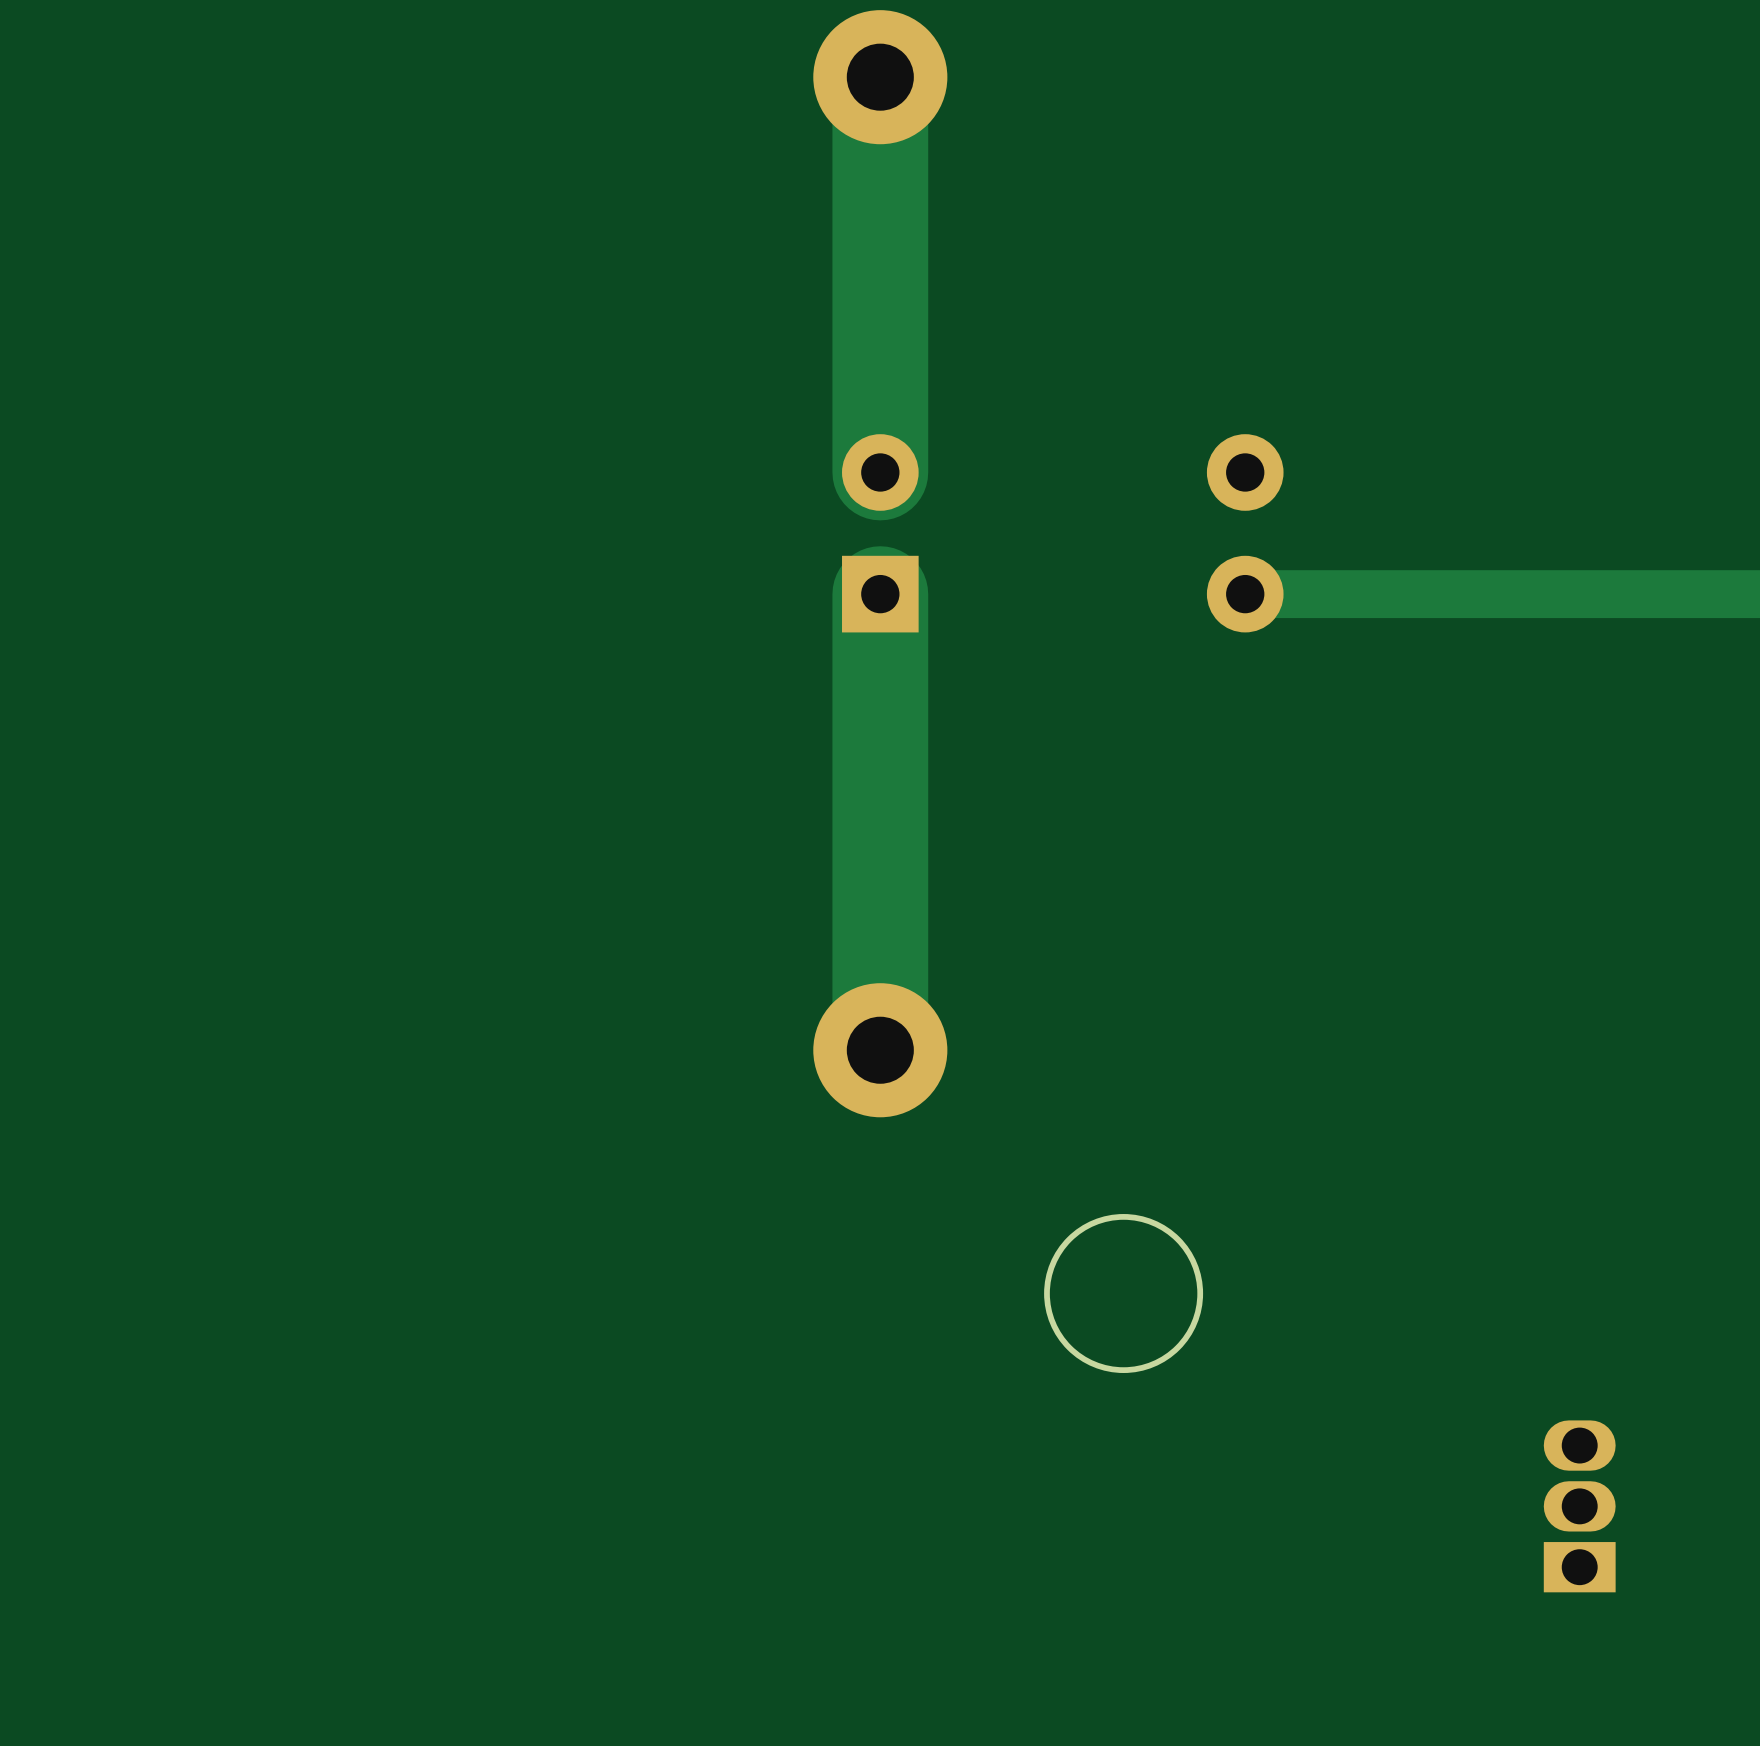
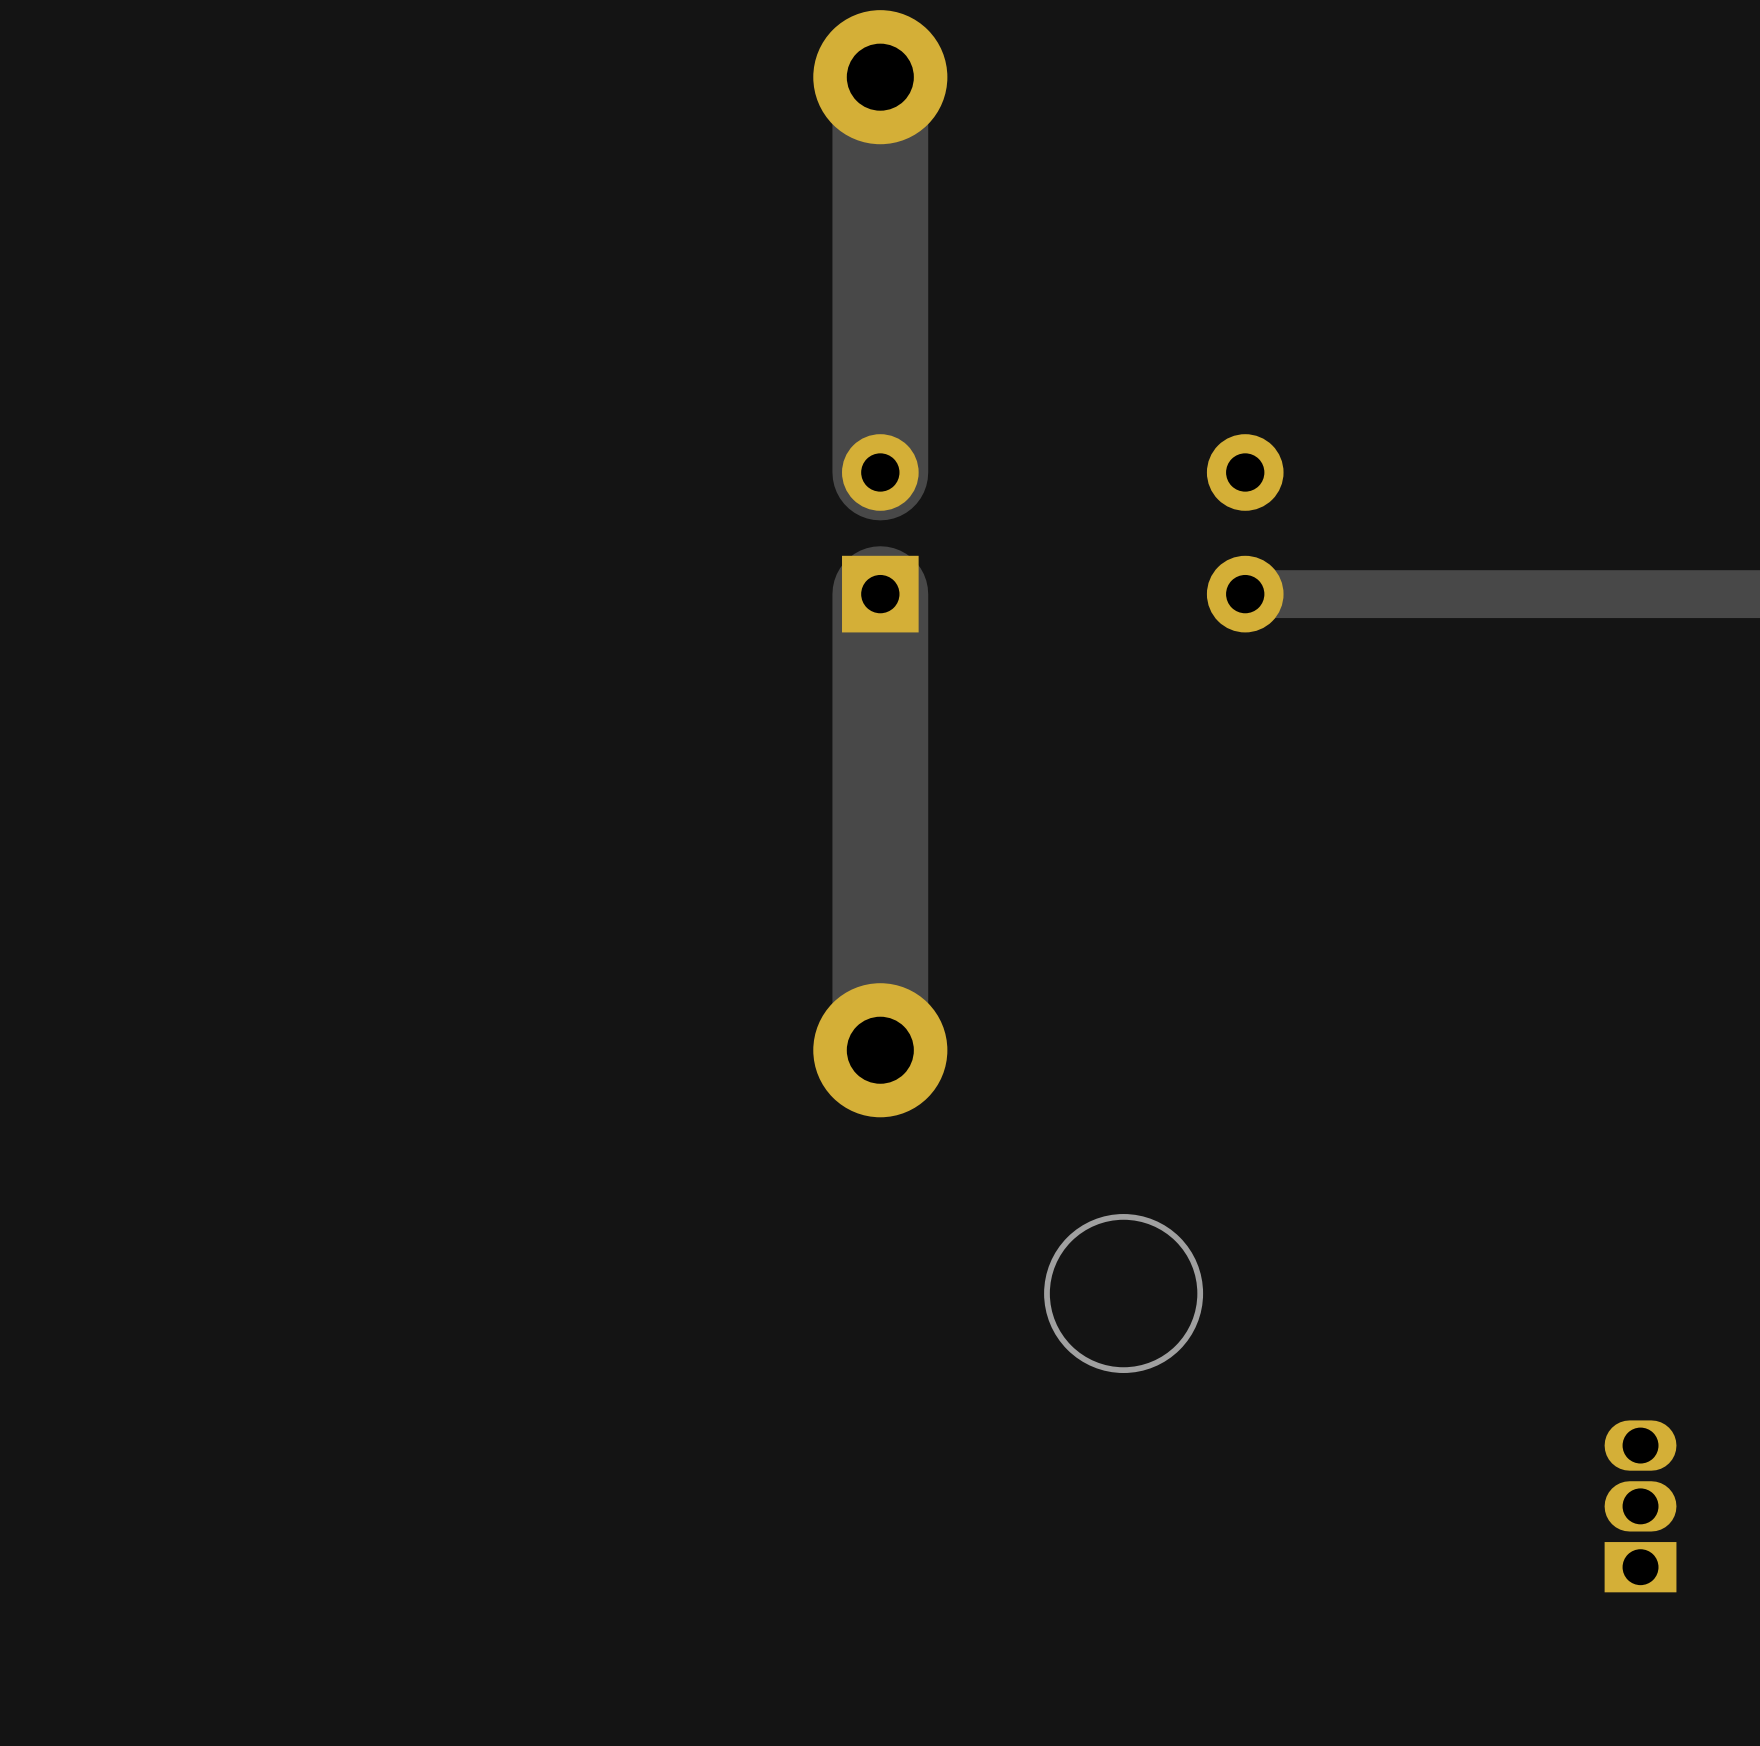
part position: (1579, 1506) -> (1640, 1506)

